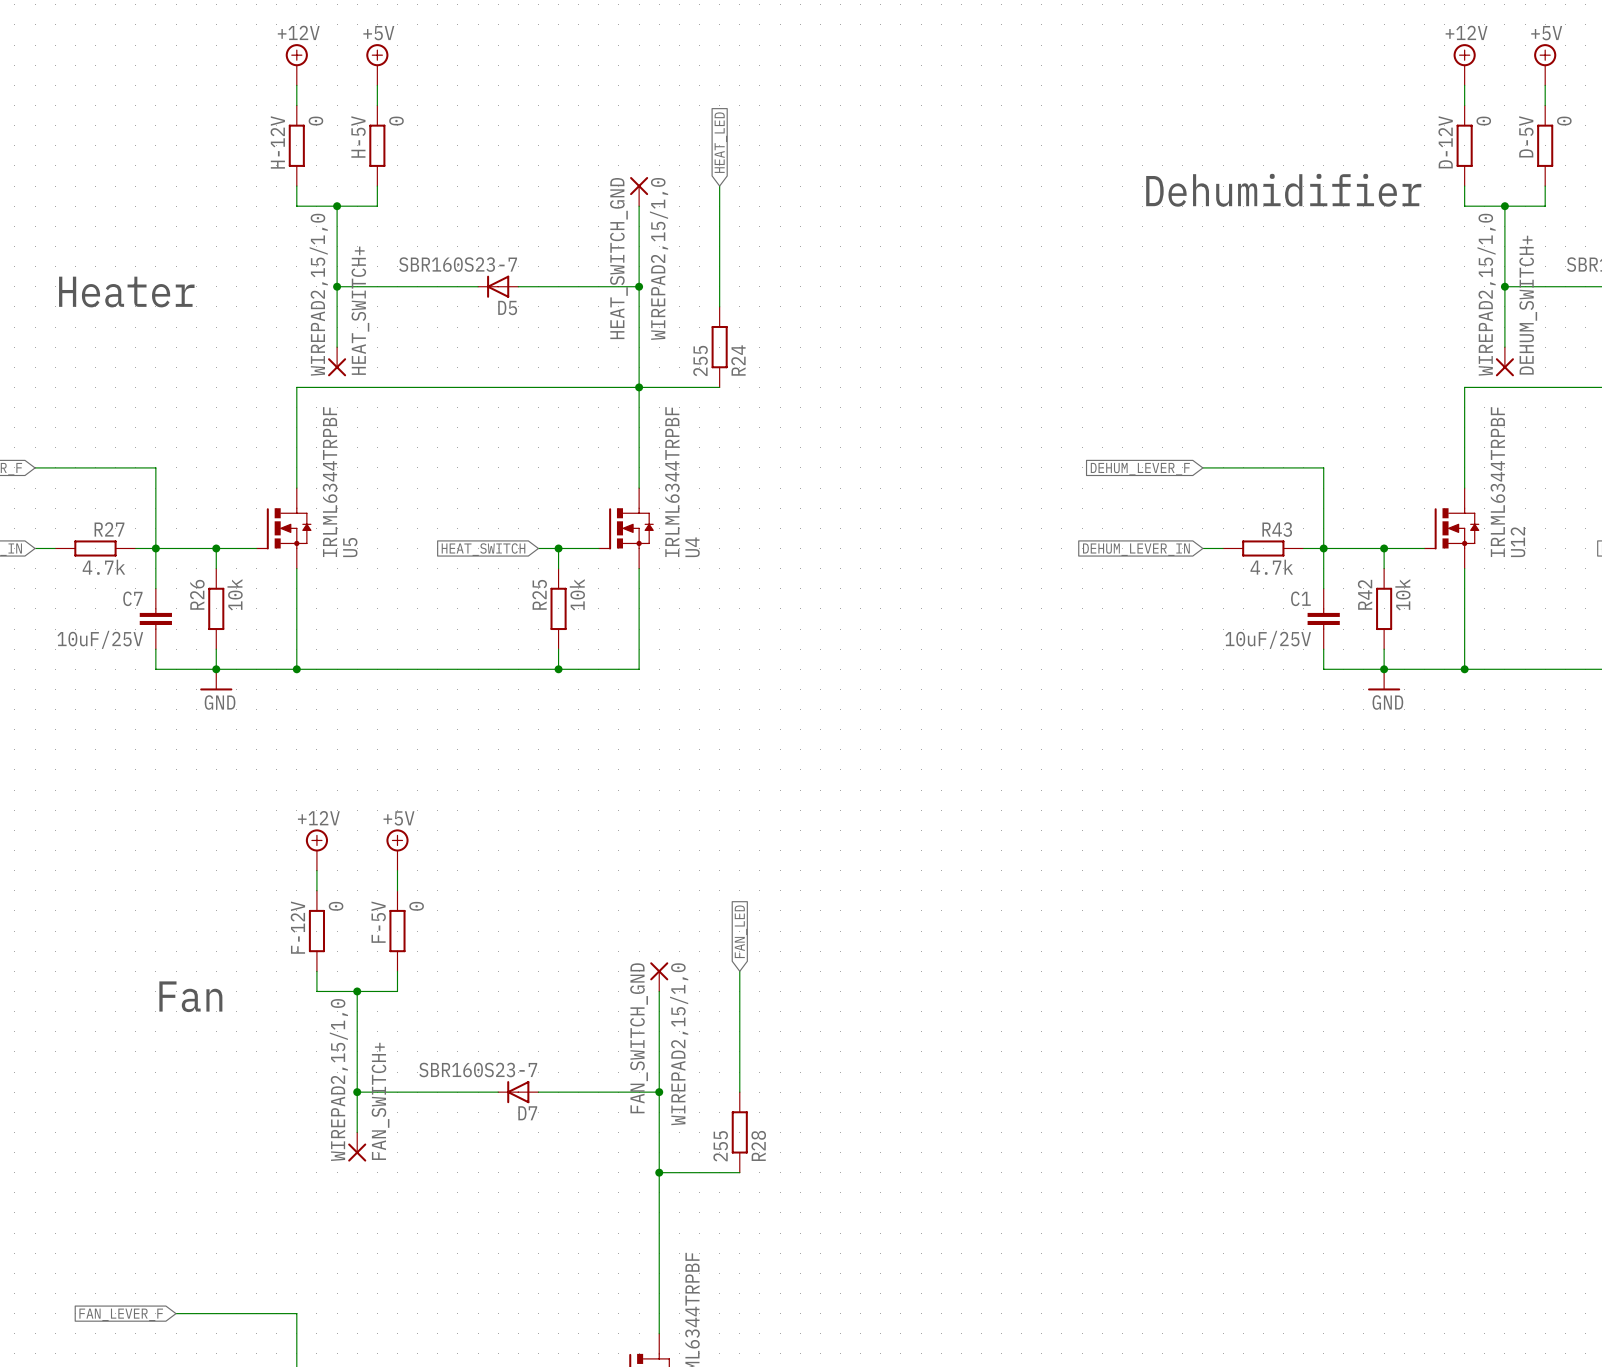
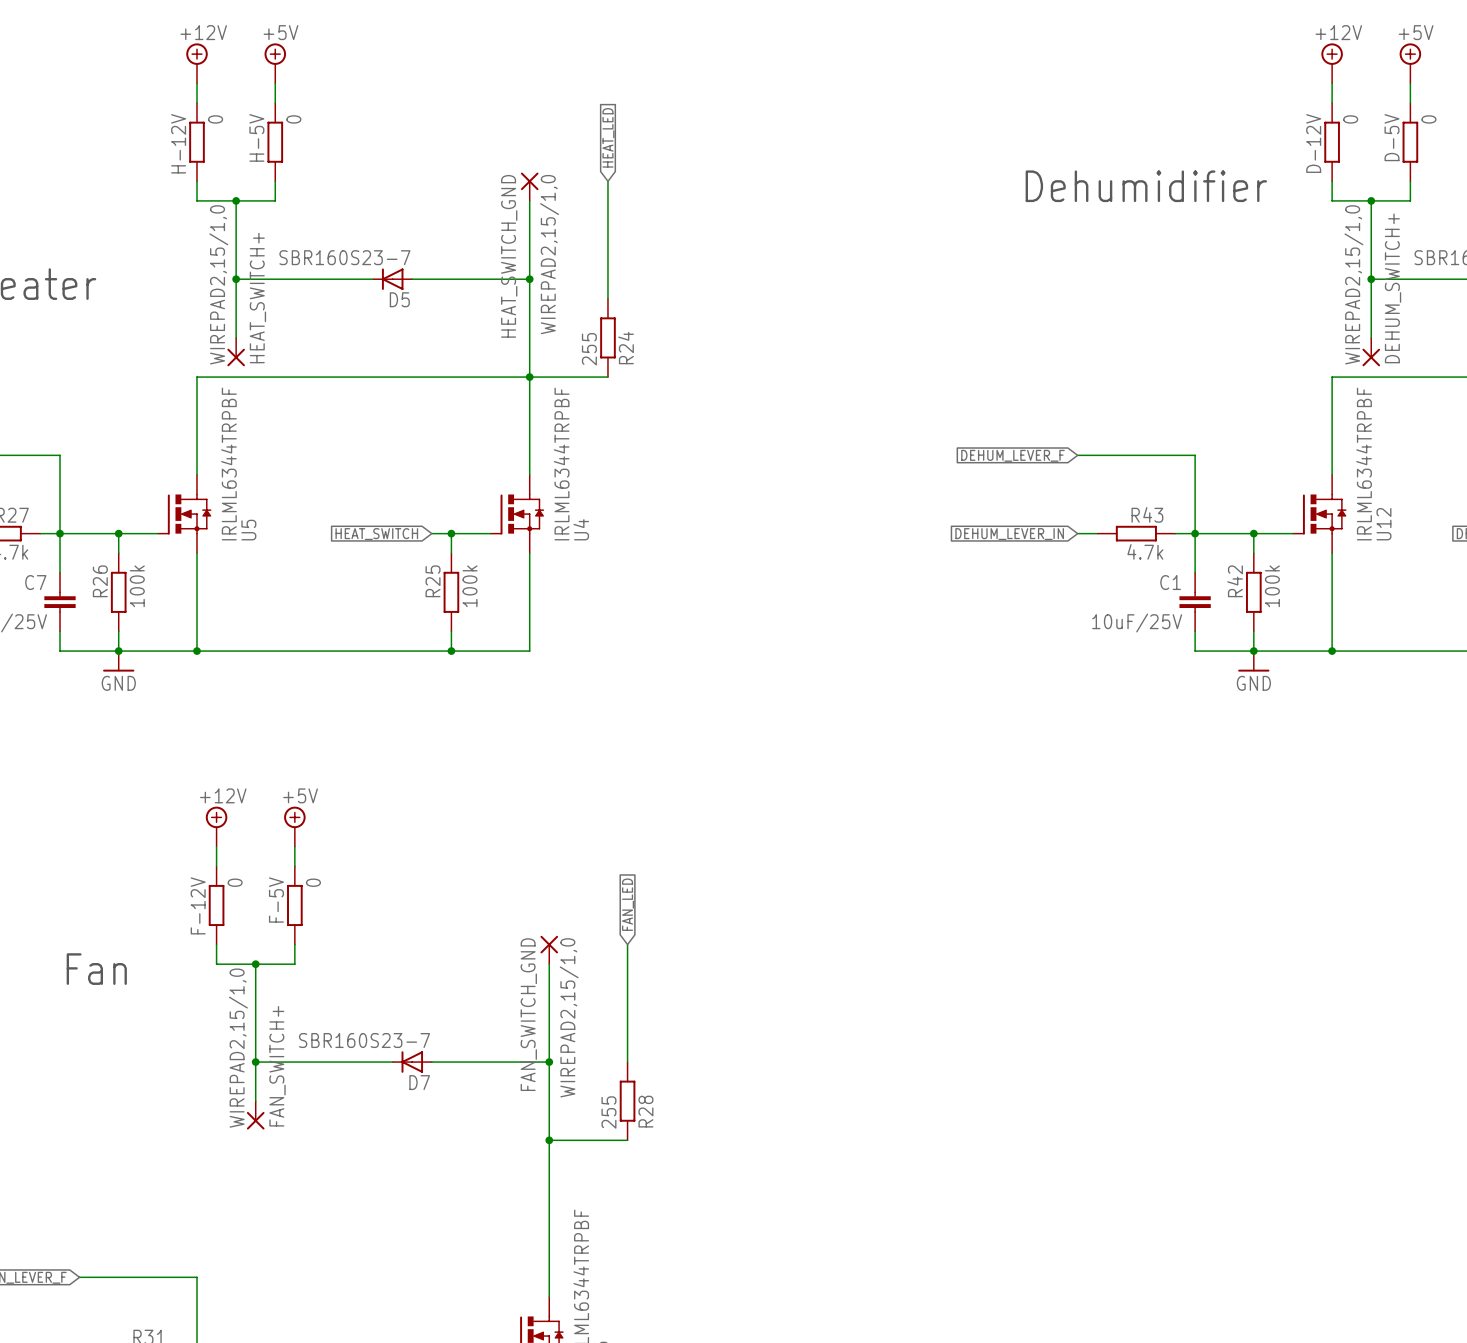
R26 value: 10k (235, 594) -> 100k (137, 586)
R25 value: 10k (577, 594) -> 100k (470, 586)
R42 value: 10k (1402, 594) -> 100k (1272, 586)

